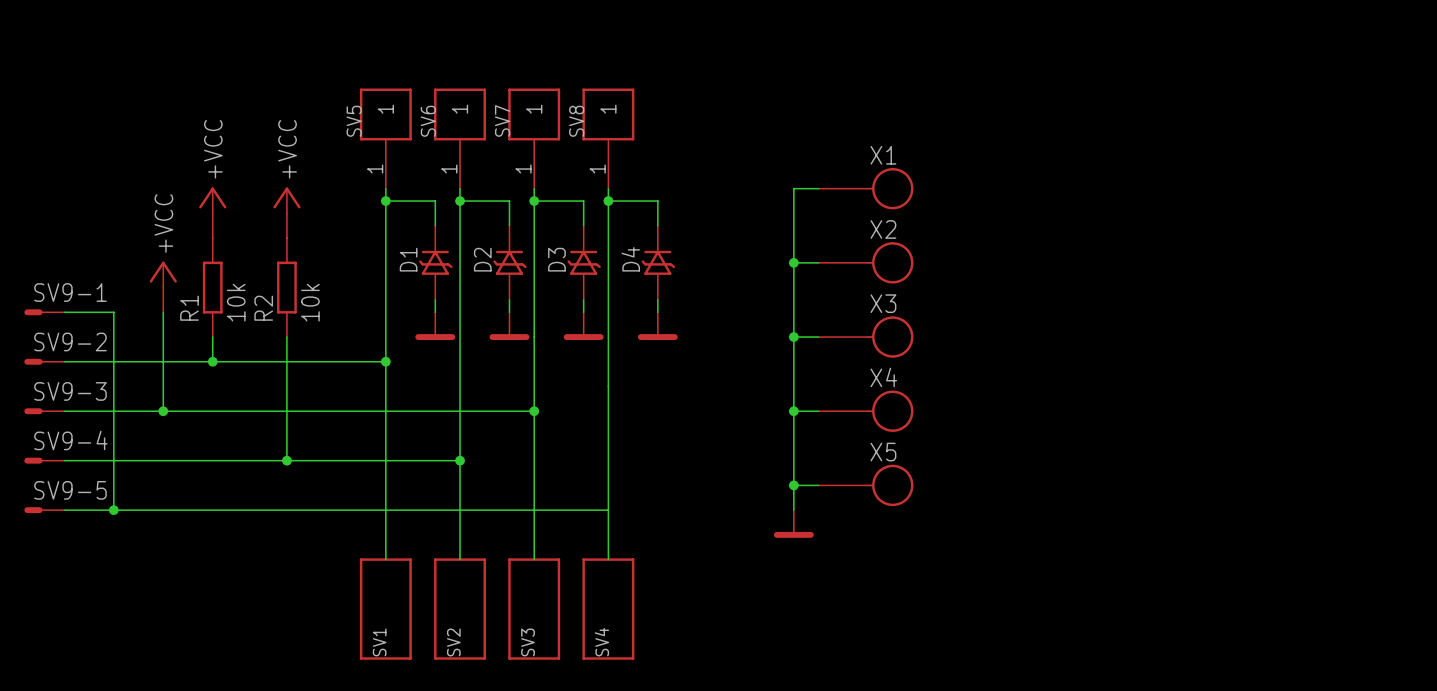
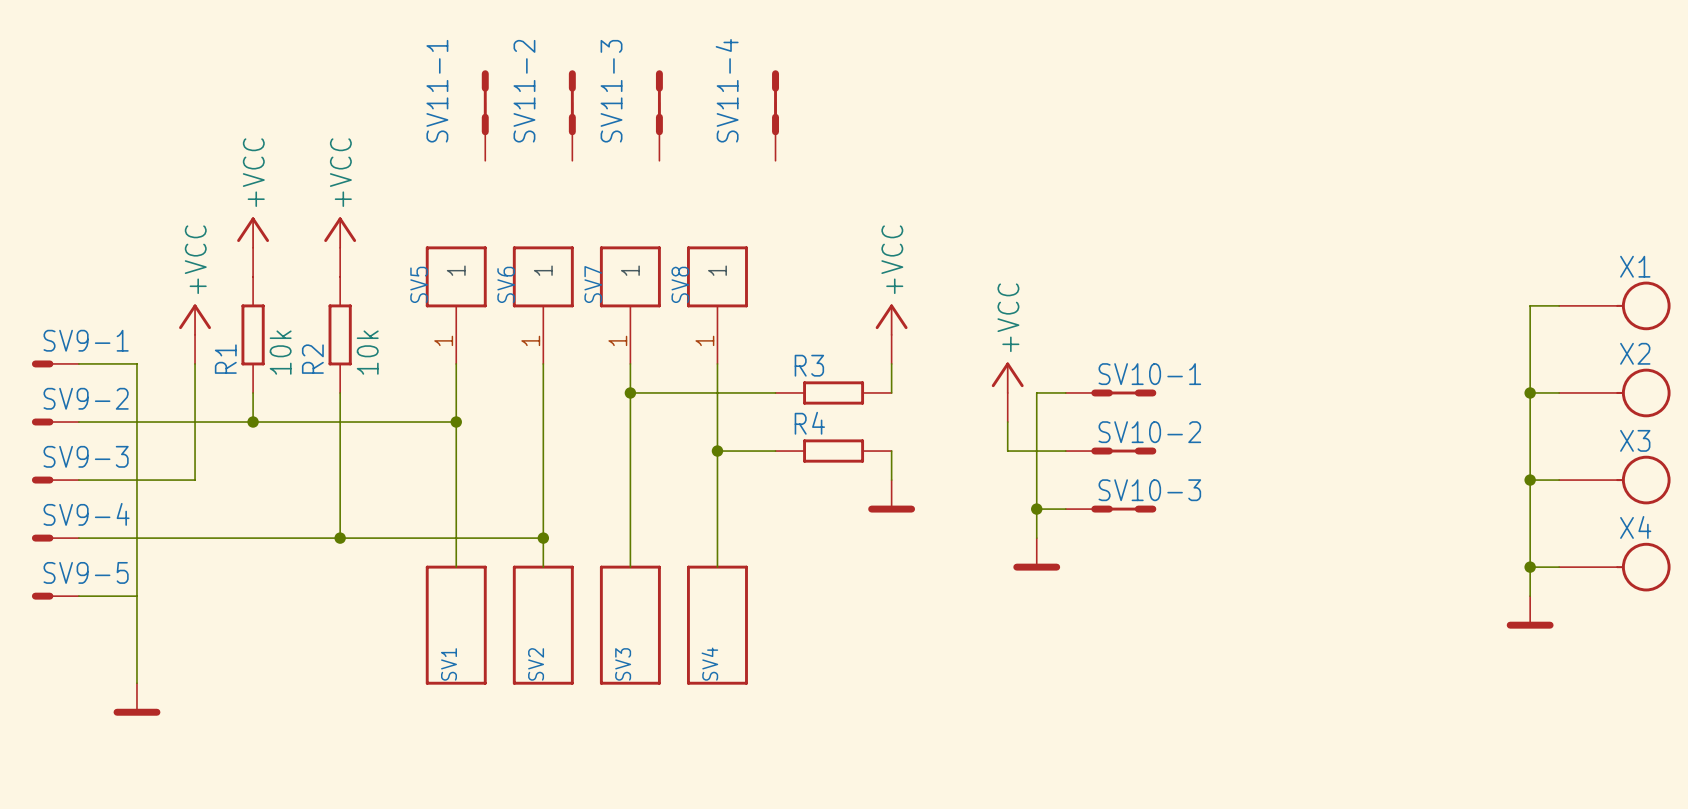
SV11-1: none -> (485, 115)
SV11-2: none -> (572, 115)
SV11-3: none -> (659, 115)
SV11-4: none -> (775, 115)
SV5 position: (385, 138) -> (456, 305)
SV6 position: (460, 138) -> (543, 305)
SV7 position: (534, 138) -> (630, 305)
SV8 position: (608, 138) -> (717, 305)
wire: (385, 188) (385, 312) -> none
wire: (460, 188) (460, 312) -> none
wire: (534, 188) (534, 312) -> none
wire: (608, 188) (608, 312) -> none
wire: (818, 188) (793, 188) (793, 510) -> none
X1 position: (866, 188) -> (1614, 305)
wire: (385, 201) (435, 201) (435, 225) -> none
junction: (385, 201) -> none
wire: (460, 201) (509, 201) (509, 225) -> none
junction: (460, 201) -> none
wire: (534, 201) (583, 201) (583, 225) -> none
junction: (534, 201) -> none
wire: (608, 201) (657, 201) (657, 225) -> none
junction: (608, 201) -> none
D1: (435, 262) -> none
D2: (510, 262) -> none
D3: (584, 262) -> none
D4: (658, 262) -> none
wire: (793, 262) (818, 262) -> none
junction: (793, 262) -> none
X2 position: (866, 262) -> (1614, 392)
wire: none -> (1559, 305) (1530, 305) (1530, 596)
power symbol: none -> +VCC (891, 334)
wire: (435, 299) (435, 312) -> none
wire: (509, 299) (509, 312) -> none
wire: (583, 299) (583, 312) -> none
wire: (657, 299) (657, 312) -> none
wire: none -> (891, 363) (891, 392)
power symbol: (435, 326) -> none
power symbol: (509, 326) -> none
power symbol: (583, 326) -> none
power symbol: (657, 326) -> none
power symbol: none -> +VCC (1007, 392)
wire: none -> (630, 392) (775, 392)
junction: none -> (630, 392)
R3: none -> (833, 392)
wire: (793, 337) (818, 337) -> none
junction: (793, 337) -> none
X3 position: (866, 337) -> (1614, 480)
wire: none -> (1065, 392) (1036, 392) (1036, 538)
SV10-1: none -> (1111, 392)
wire: none -> (1530, 392) (1559, 392)
junction: none -> (1530, 392)
wire: none -> (1007, 422) (1007, 451) (1065, 451)
wire: none -> (717, 451) (775, 451)
junction: none -> (717, 451)
R4: none -> (833, 451)
wire: none -> (891, 451) (891, 480)
SV10-2: none -> (1111, 451)
wire: (163, 411) (534, 411) -> none
junction: (163, 411) -> none
junction: (534, 411) -> none
wire: (793, 411) (818, 411) -> (1036, 509) (1065, 509)
junction: (793, 411) -> none
X4 position: (866, 411) -> (1614, 567)
wire: none -> (1530, 480) (1559, 480)
junction: none -> (1530, 480)
power symbol: none -> (891, 496)
junction: none -> (1036, 509)
SV10-3: none -> (1111, 509)
power symbol: none -> (1036, 554)
wire: (385, 485) (385, 559) -> none
wire: (460, 485) (460, 559) -> none
wire: (534, 485) (534, 559) -> none
wire: (608, 485) (608, 559) -> none
wire: (793, 485) (818, 485) -> none
junction: (793, 485) -> none
X5: (866, 485) -> none
wire: none -> (1530, 567) (1559, 567)
junction: none -> (1530, 567)
wire: (113, 510) (608, 510) -> (136, 596) (136, 683)
junction: (113, 510) -> none
power symbol: (793, 523) -> none
power symbol: none -> (1530, 612)
power symbol: none -> (136, 699)
SV1 position: (385, 609) -> (456, 625)
SV2 position: (460, 609) -> (543, 625)
SV3 position: (534, 609) -> (630, 625)
SV4 position: (608, 609) -> (717, 625)

